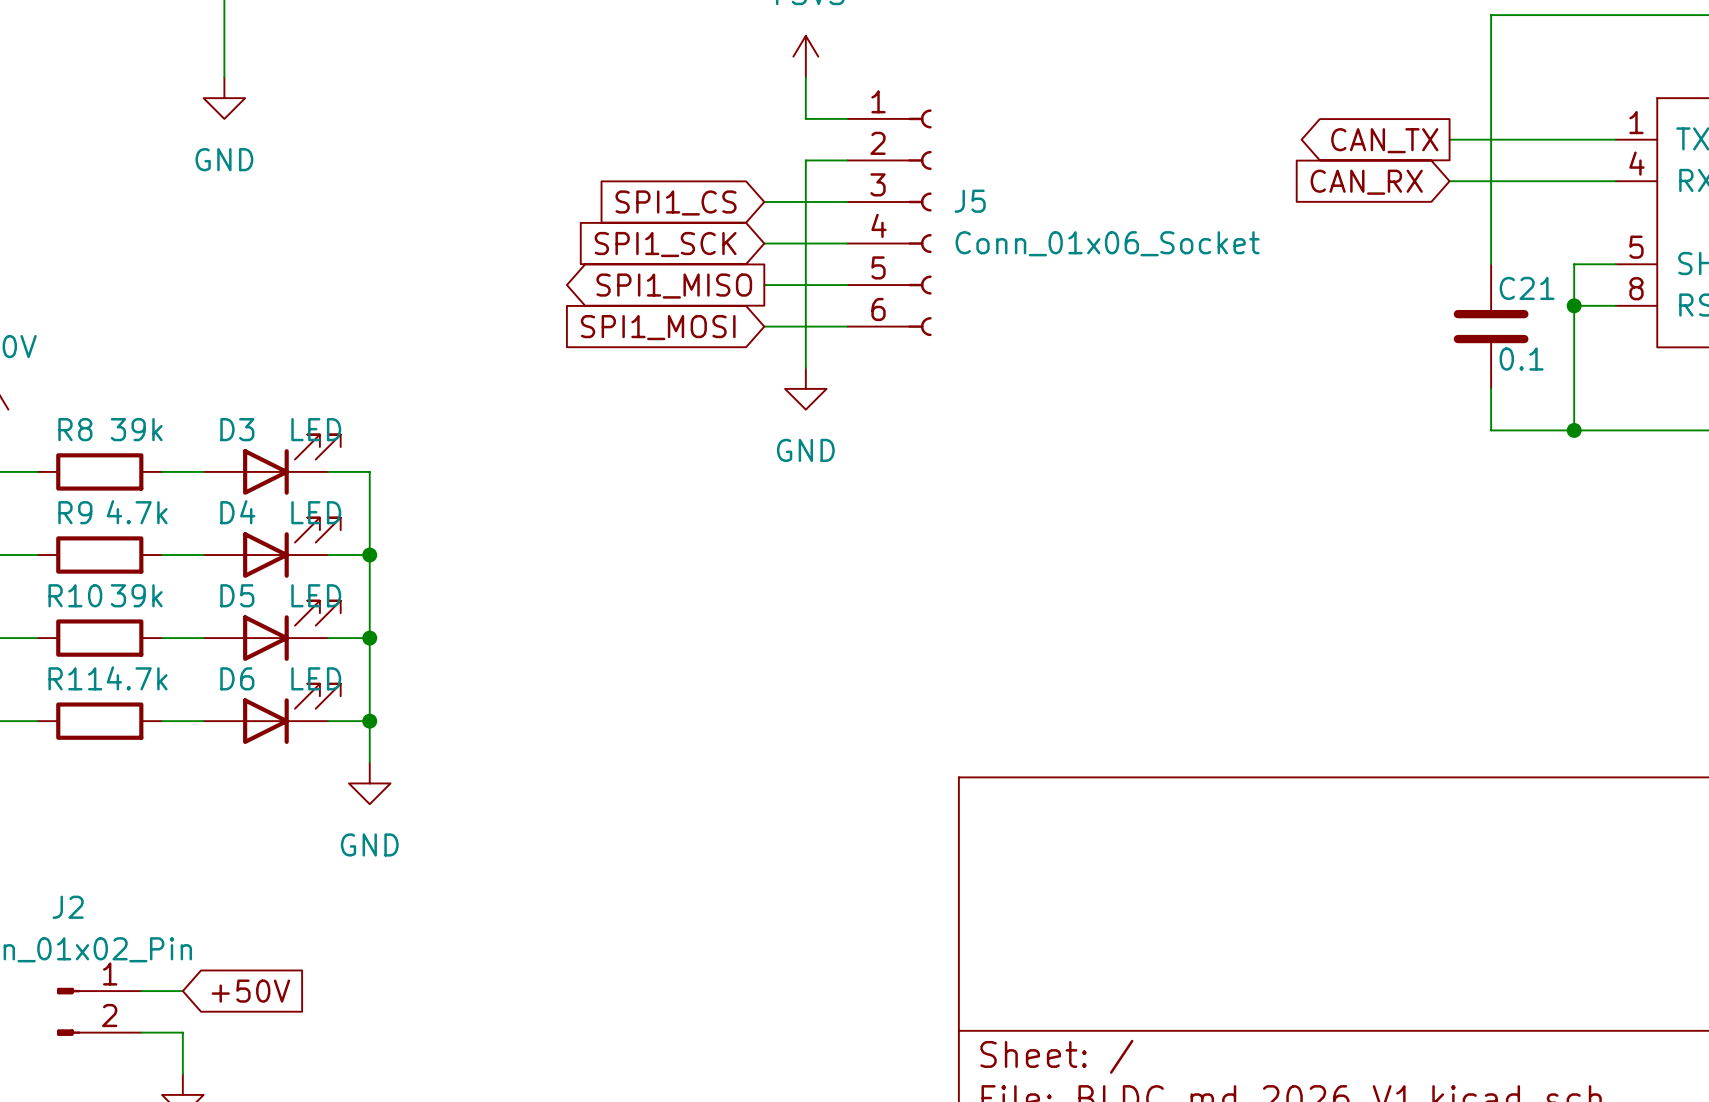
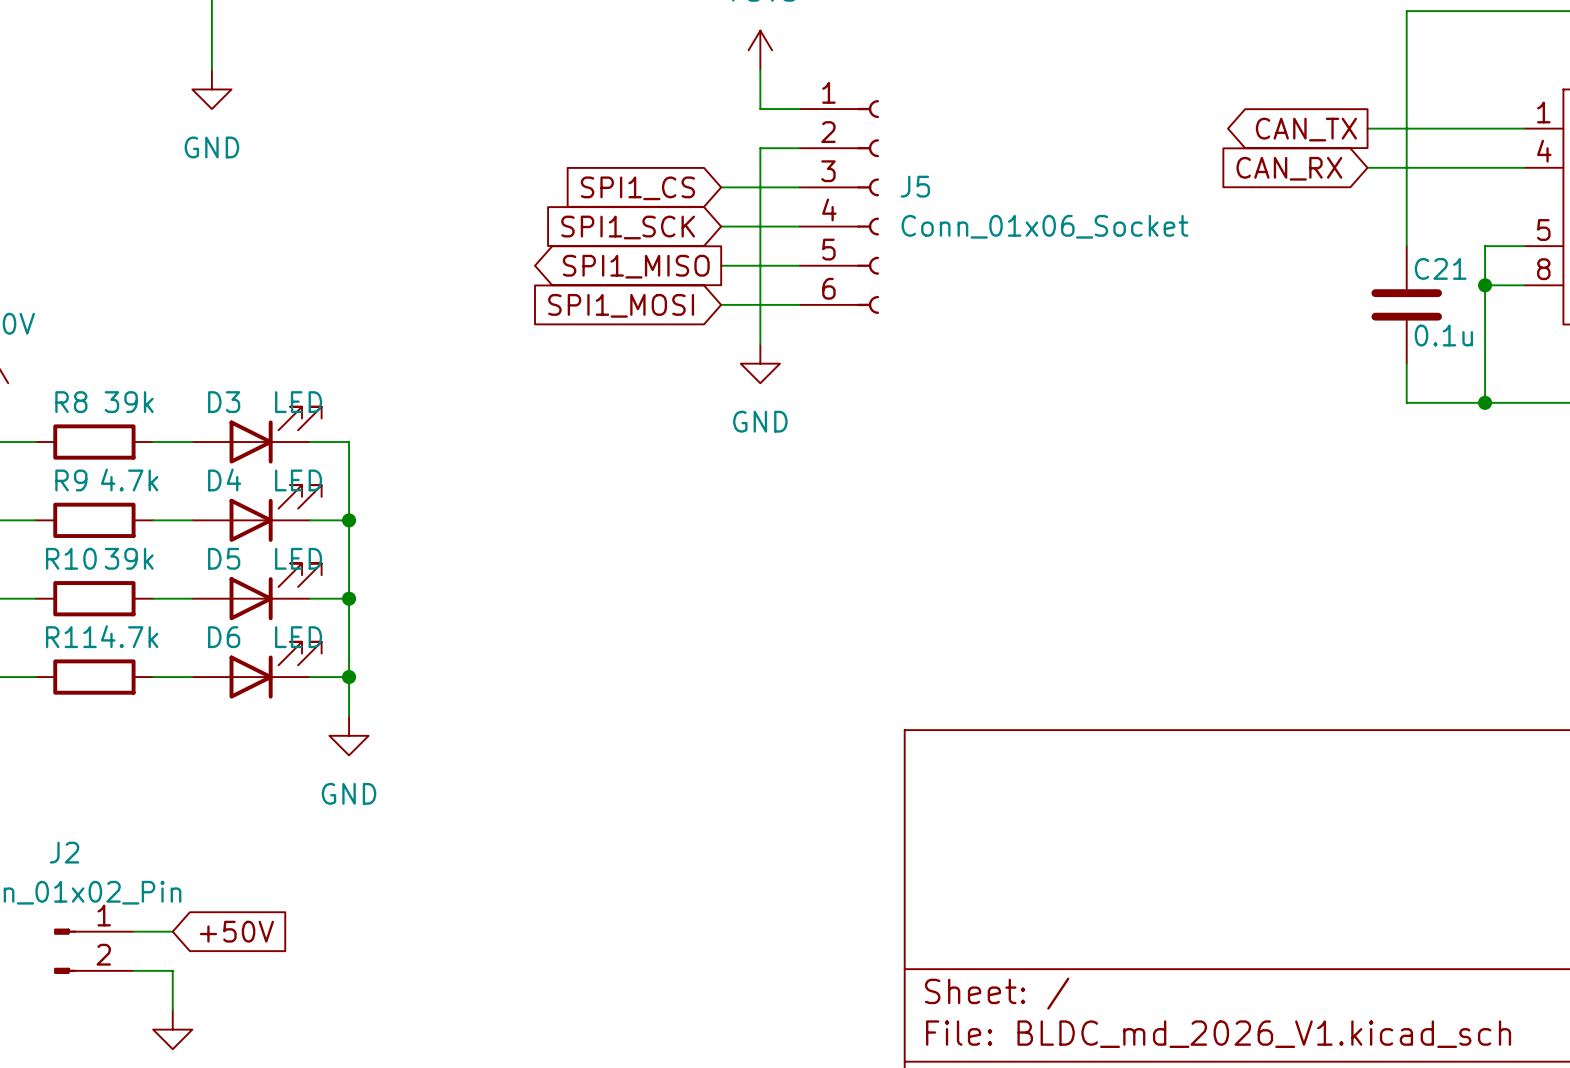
C21 value: 0.1 (1521, 359) -> 0.1u (1443, 335)

